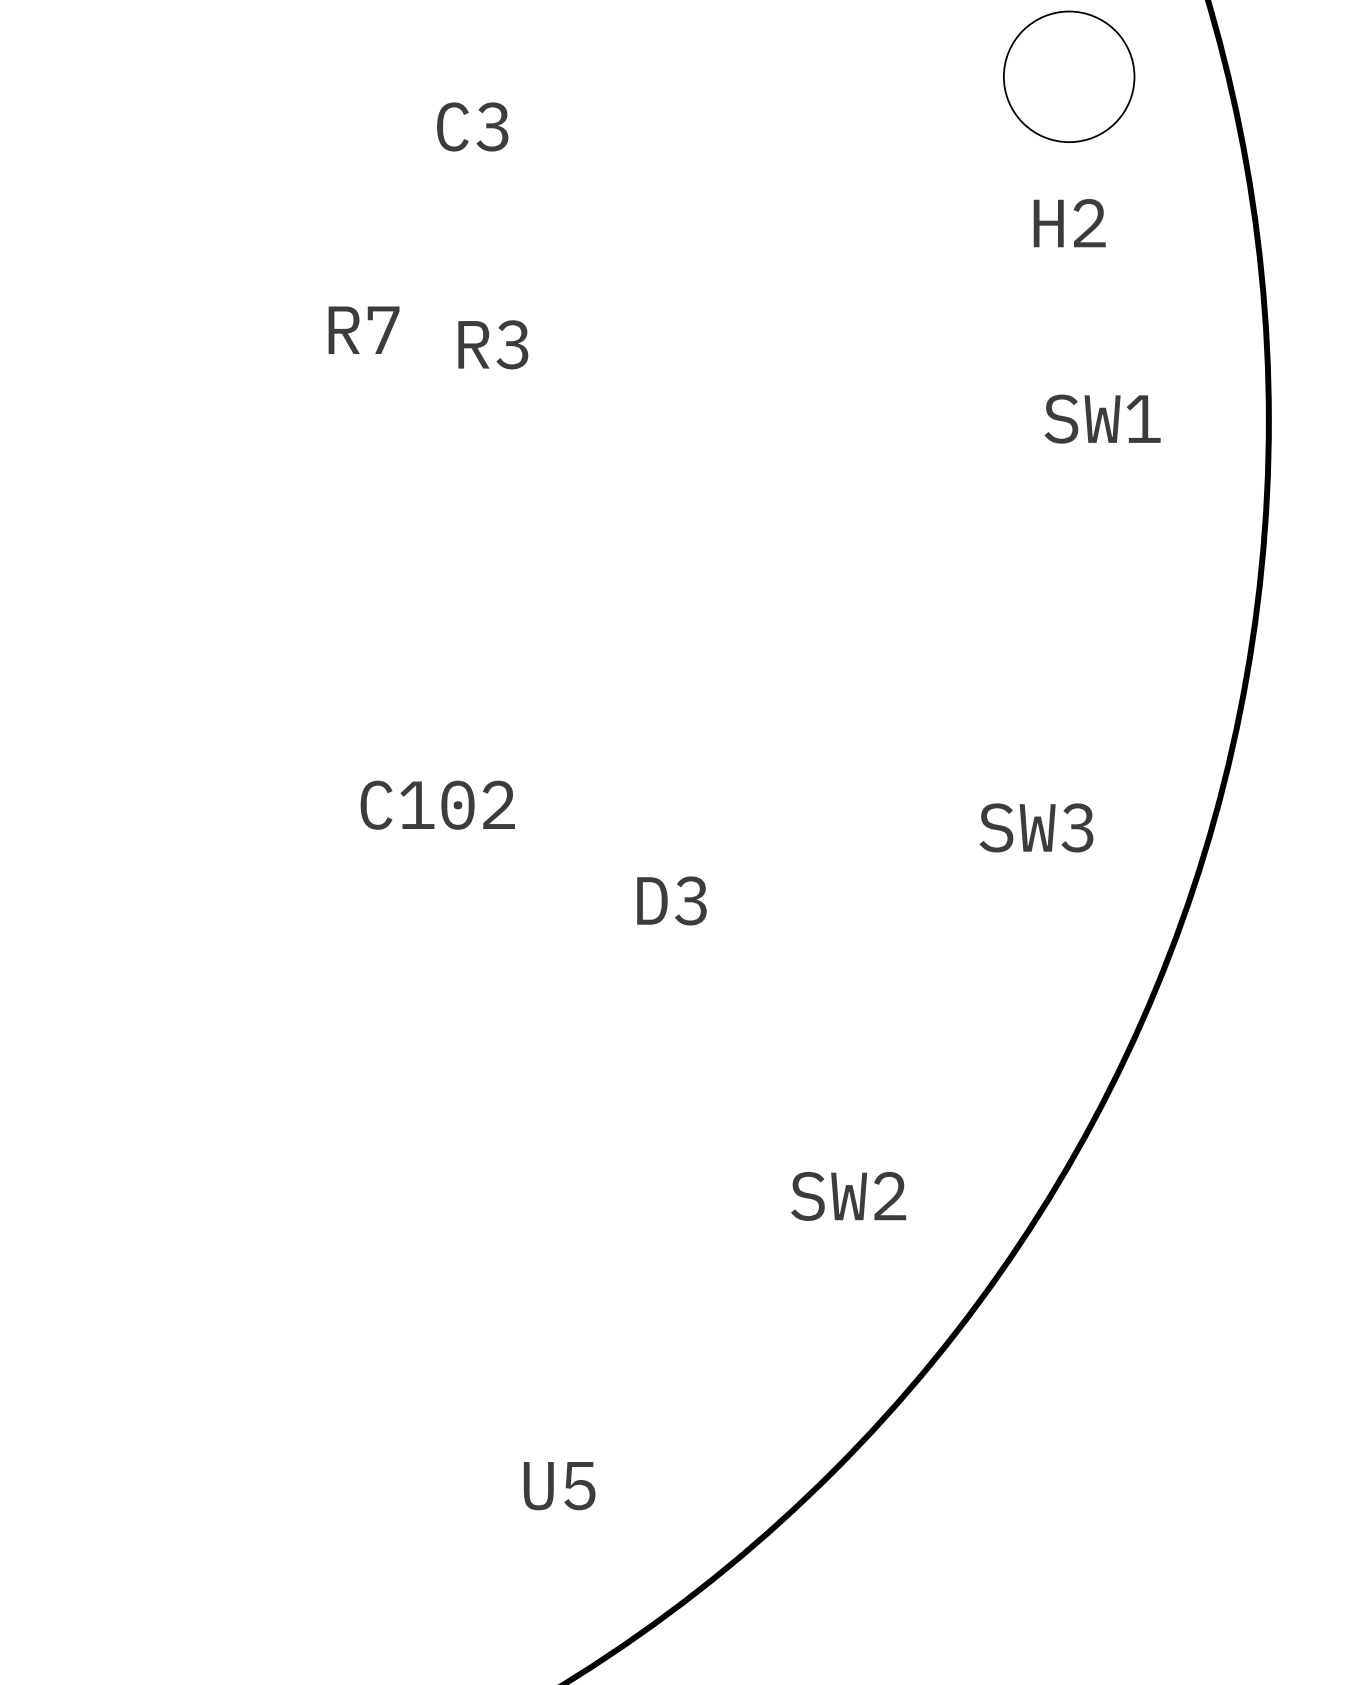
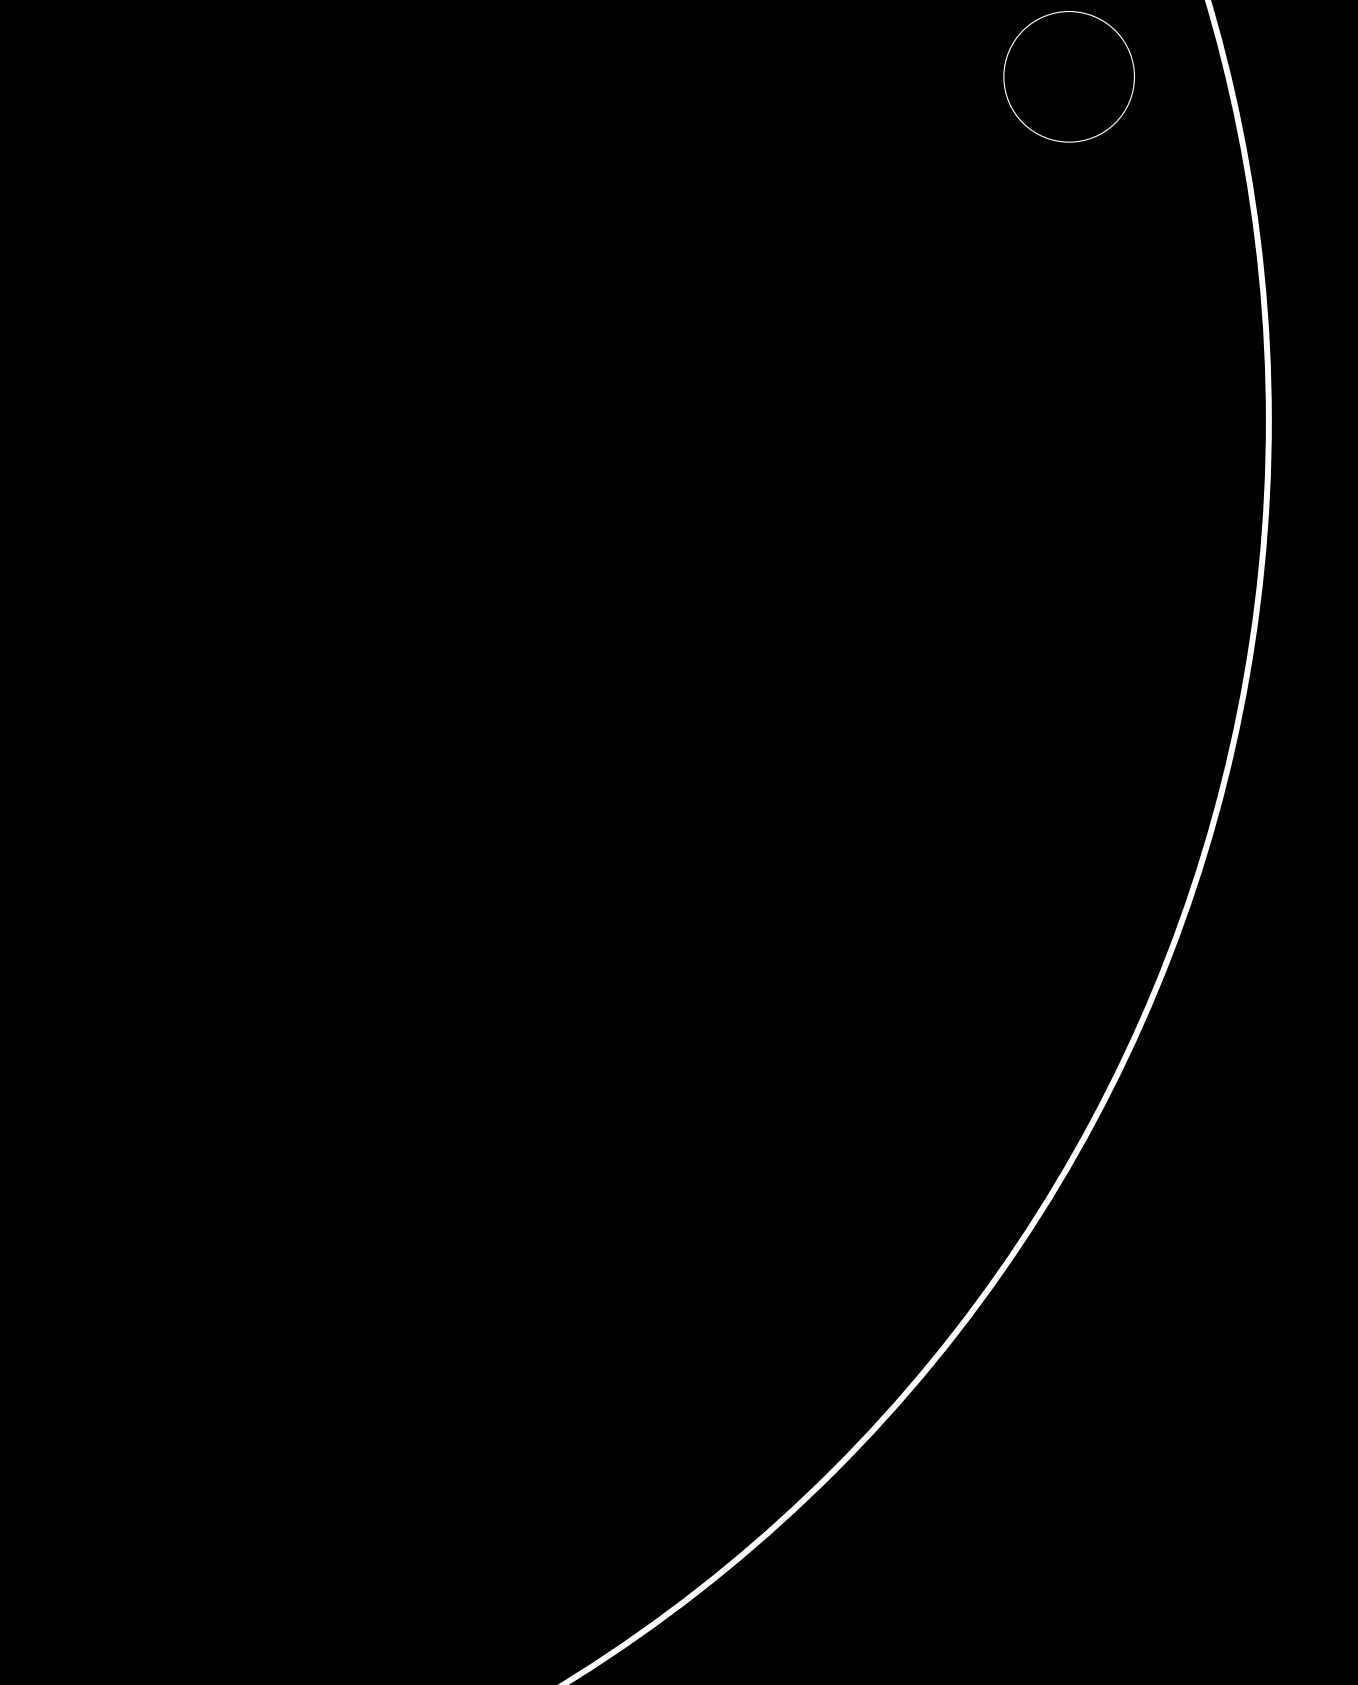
C3: (472, 126) -> none
H2 name: H2 (1069, 223) -> none
R7: (364, 330) -> none
R3: (493, 344) -> none
SW1: (1102, 419) -> none
C102: (437, 805) -> none
SW3: (1036, 827) -> none
D3: (671, 900) -> none
SW2: (848, 1196) -> none
U5: (559, 1486) -> none

